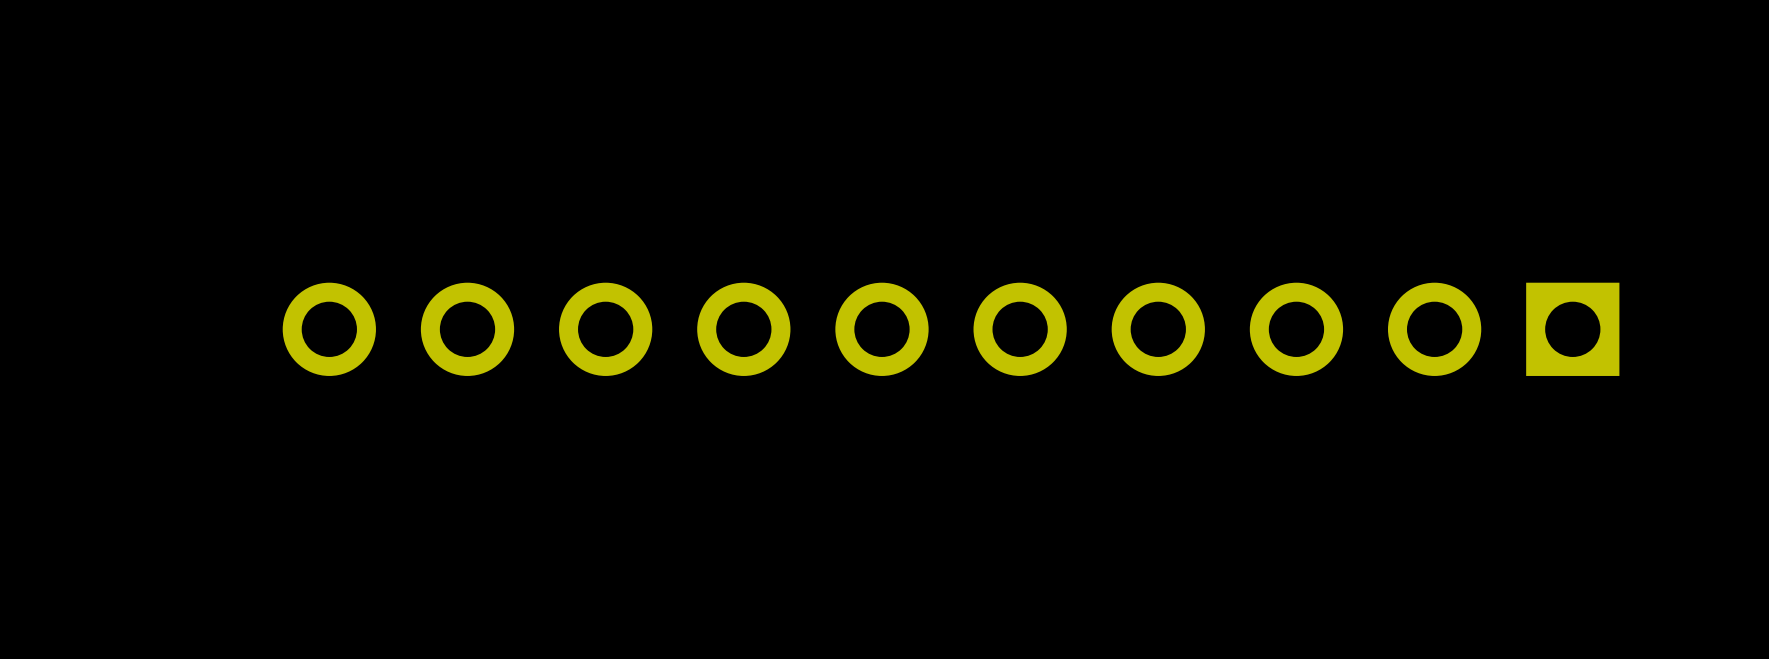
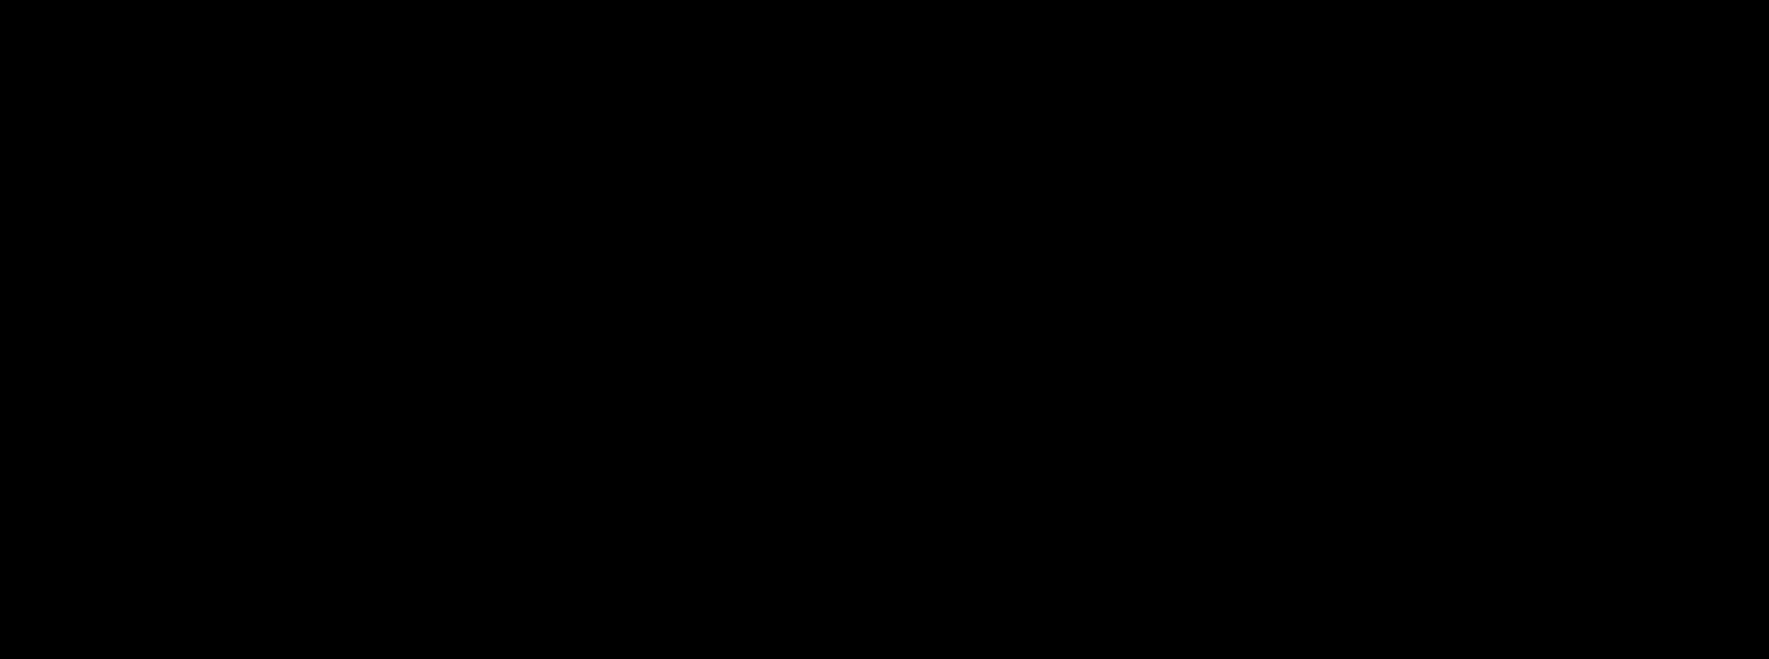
part: (951, 329) -> none

